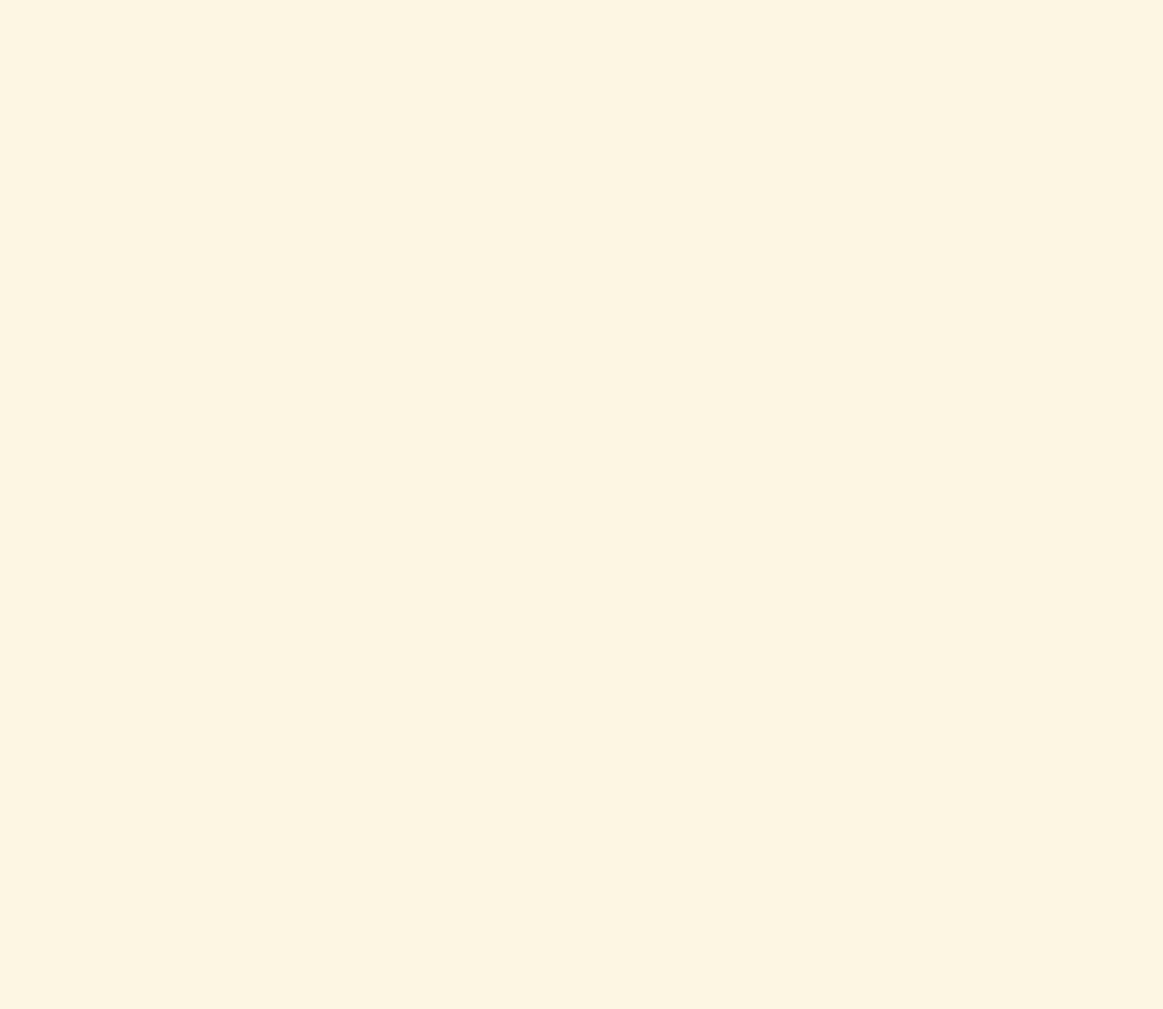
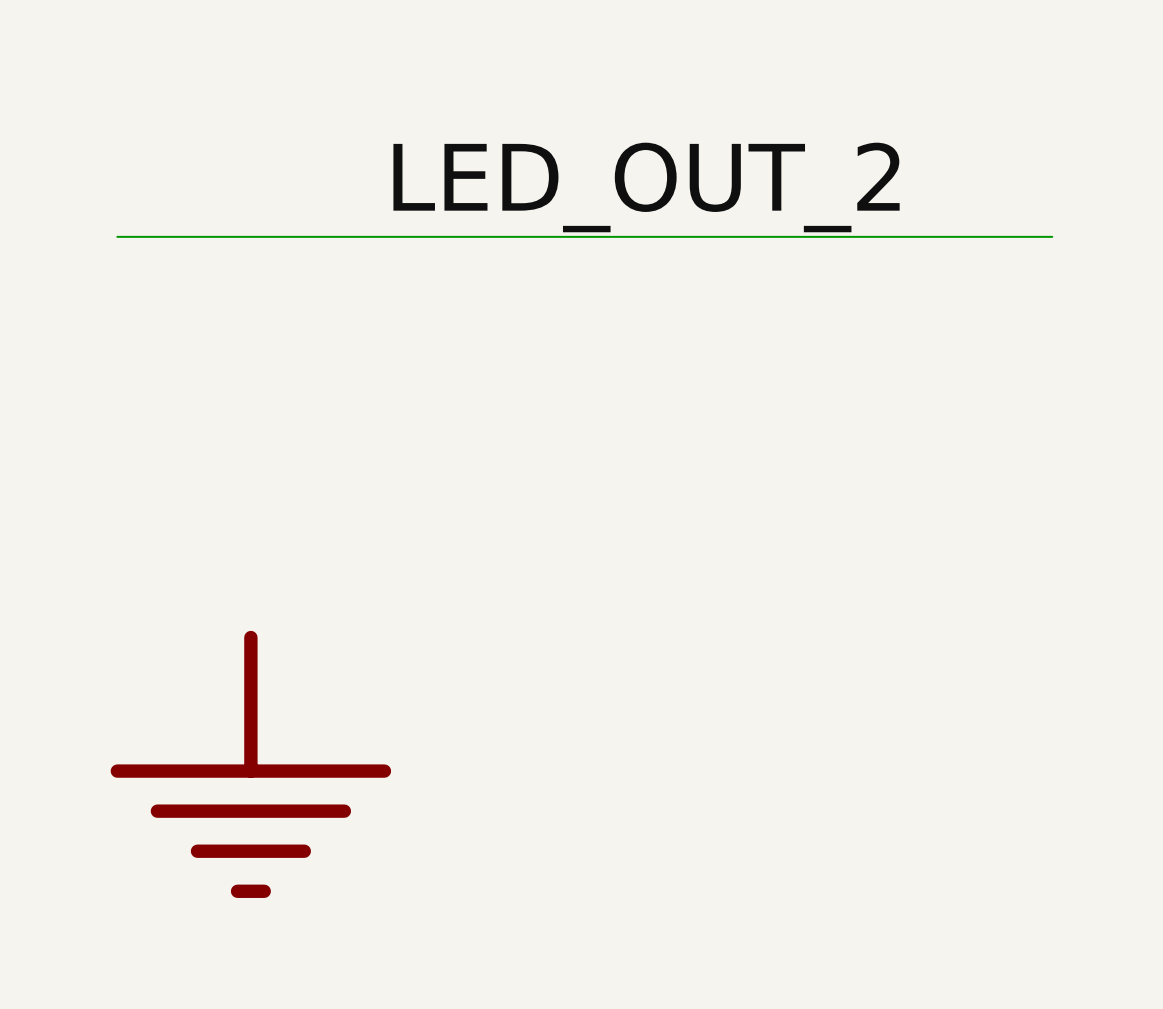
label: none -> LED_OUT_2 (646, 187)
wire: none -> (117, 236) (1052, 236)
power symbol: none -> (250, 764)

